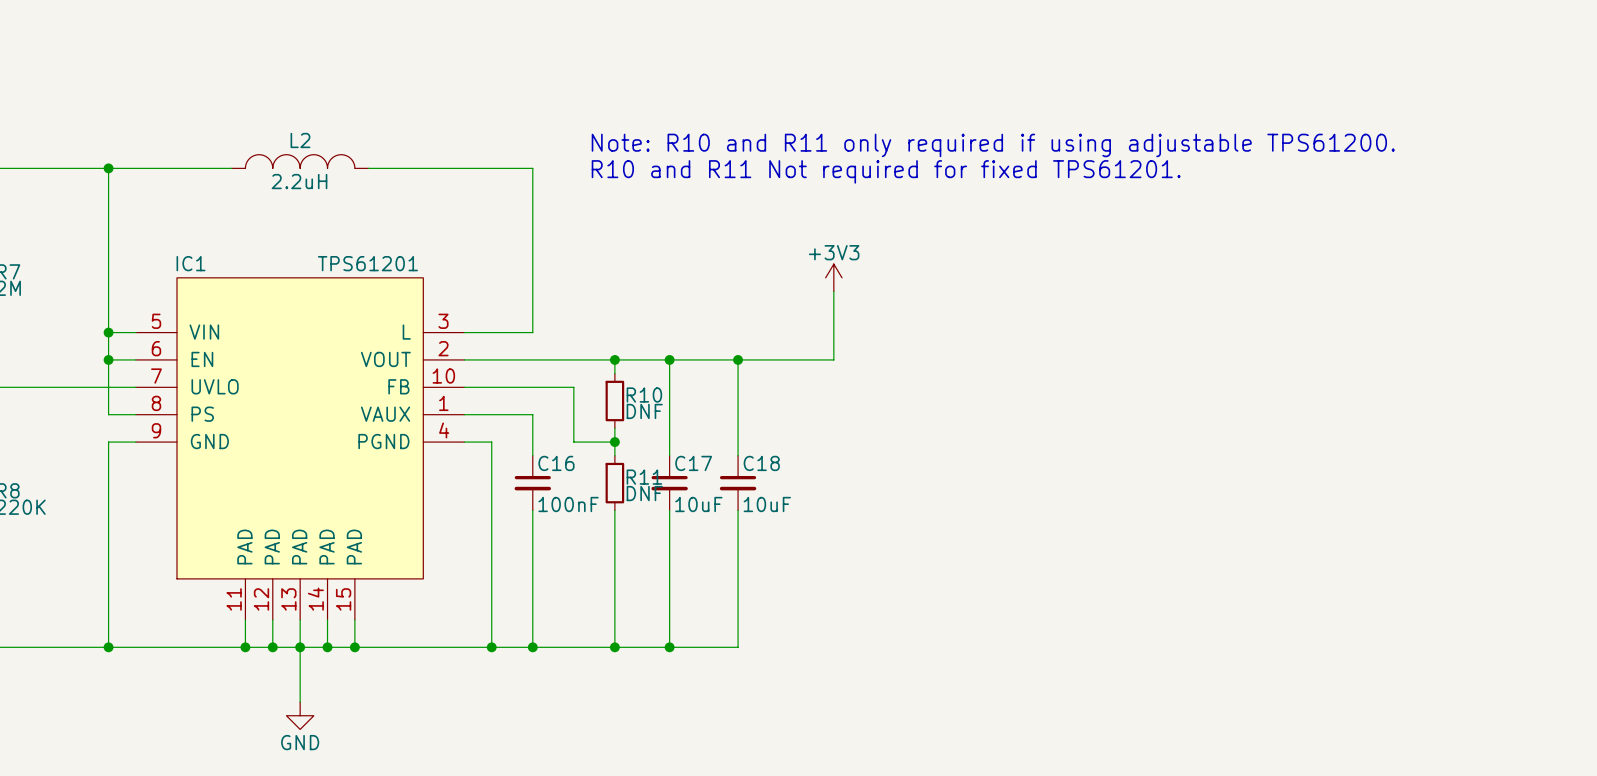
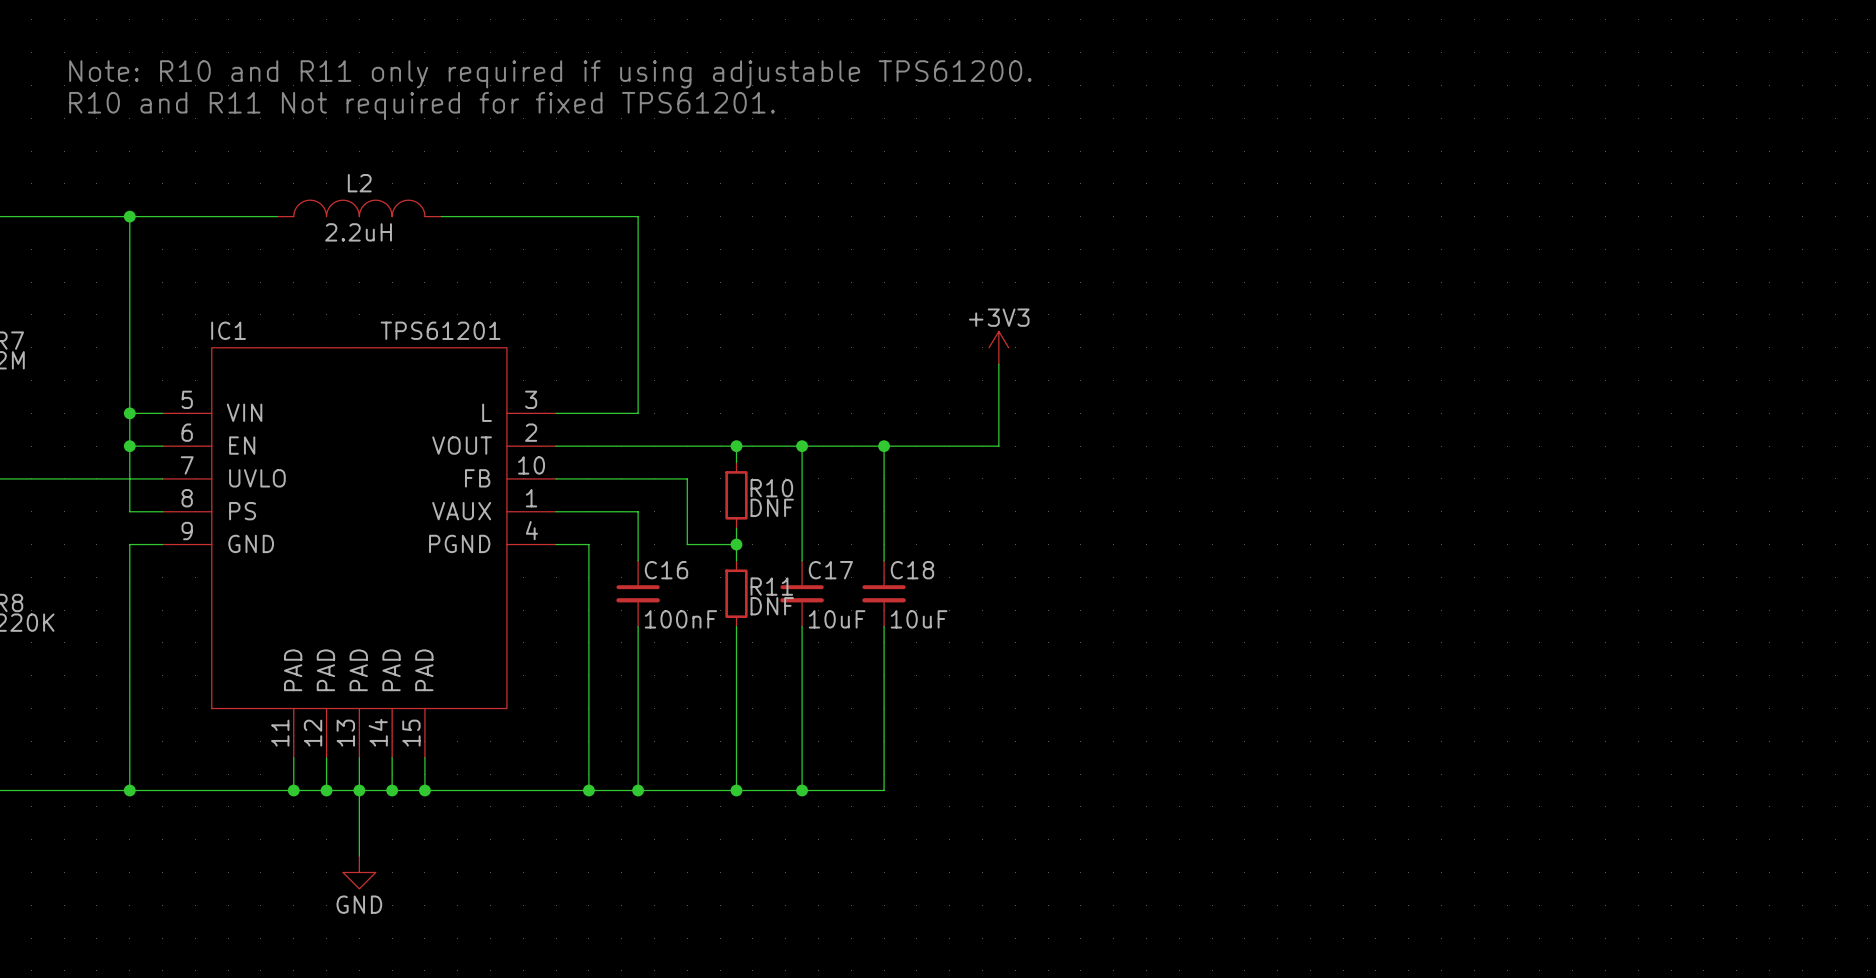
text: none -> Note: R10 and R11 only required if using adjustable TPS61200. (550, 74)
text: none -> R10 and R11 Not required for fixed TPS61201. (422, 106)
text: Note: R10 and R11 only required if using adjustable TPS61200. (993, 145) -> none
text: R10 and R11 Not required for fixed TPS61201. (886, 171) -> none

